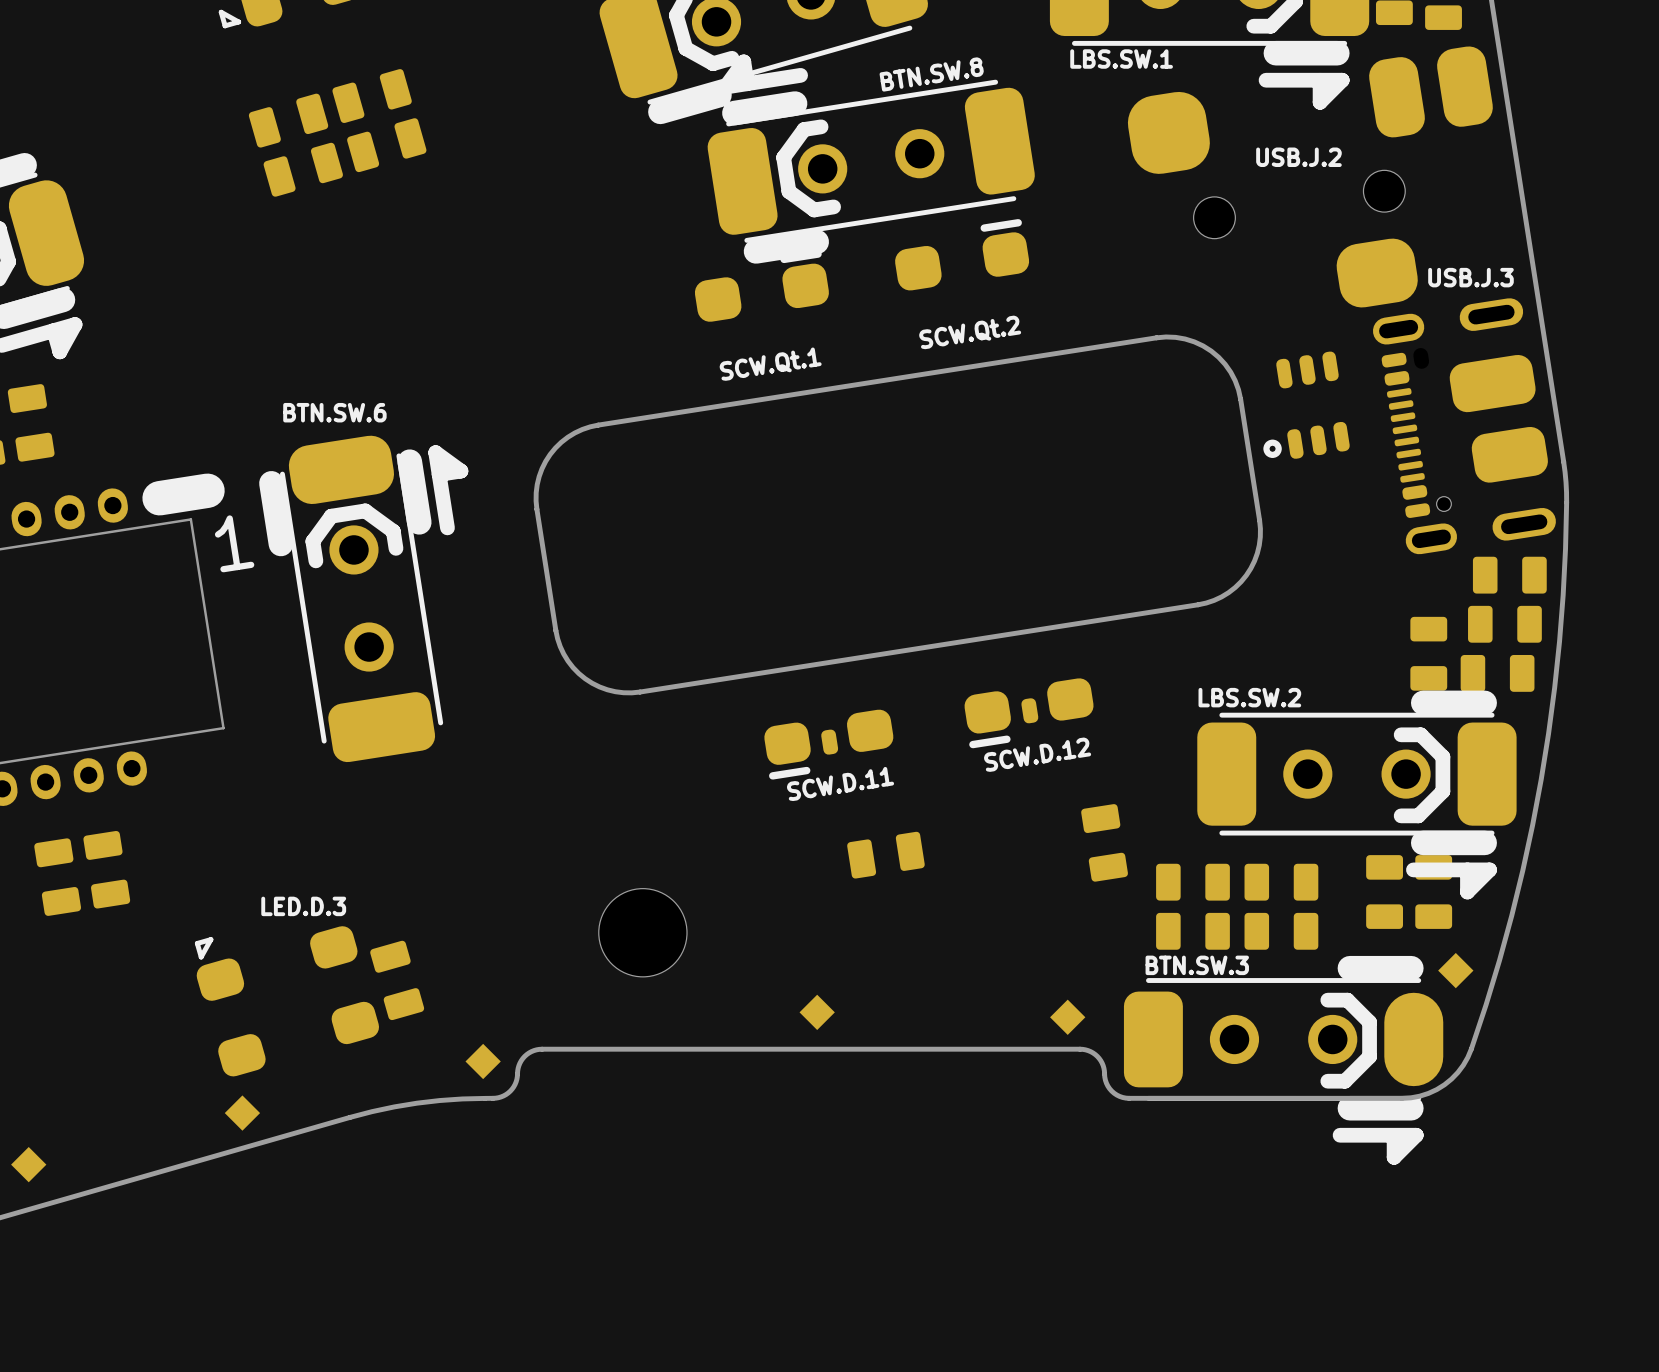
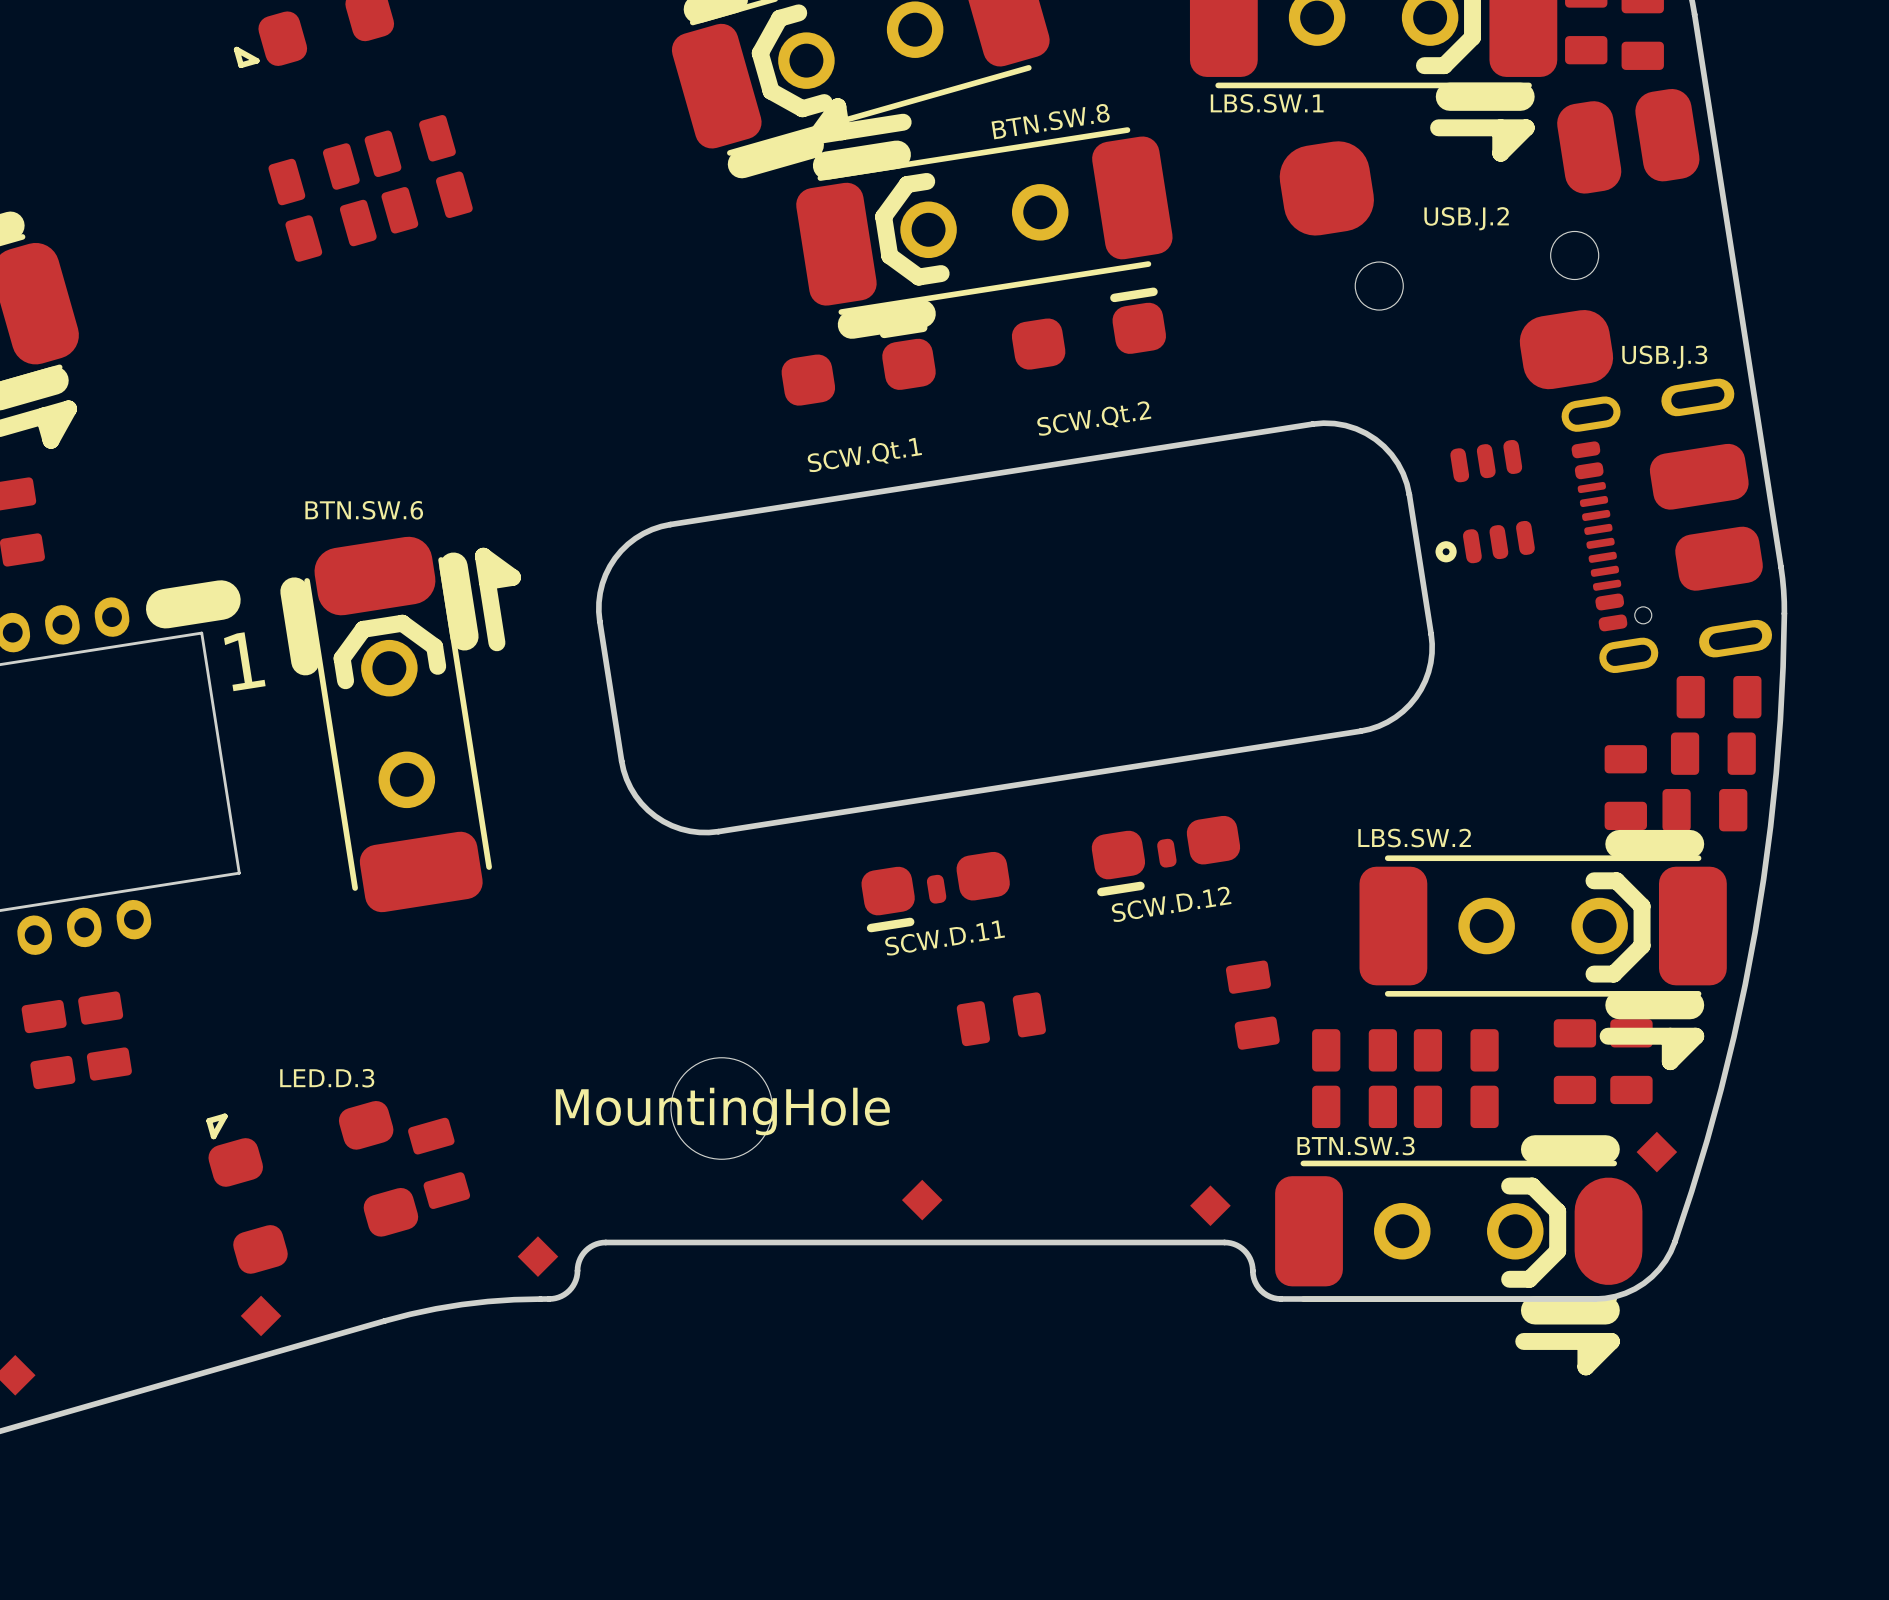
part value: none -> MountingHole (722, 1111)

